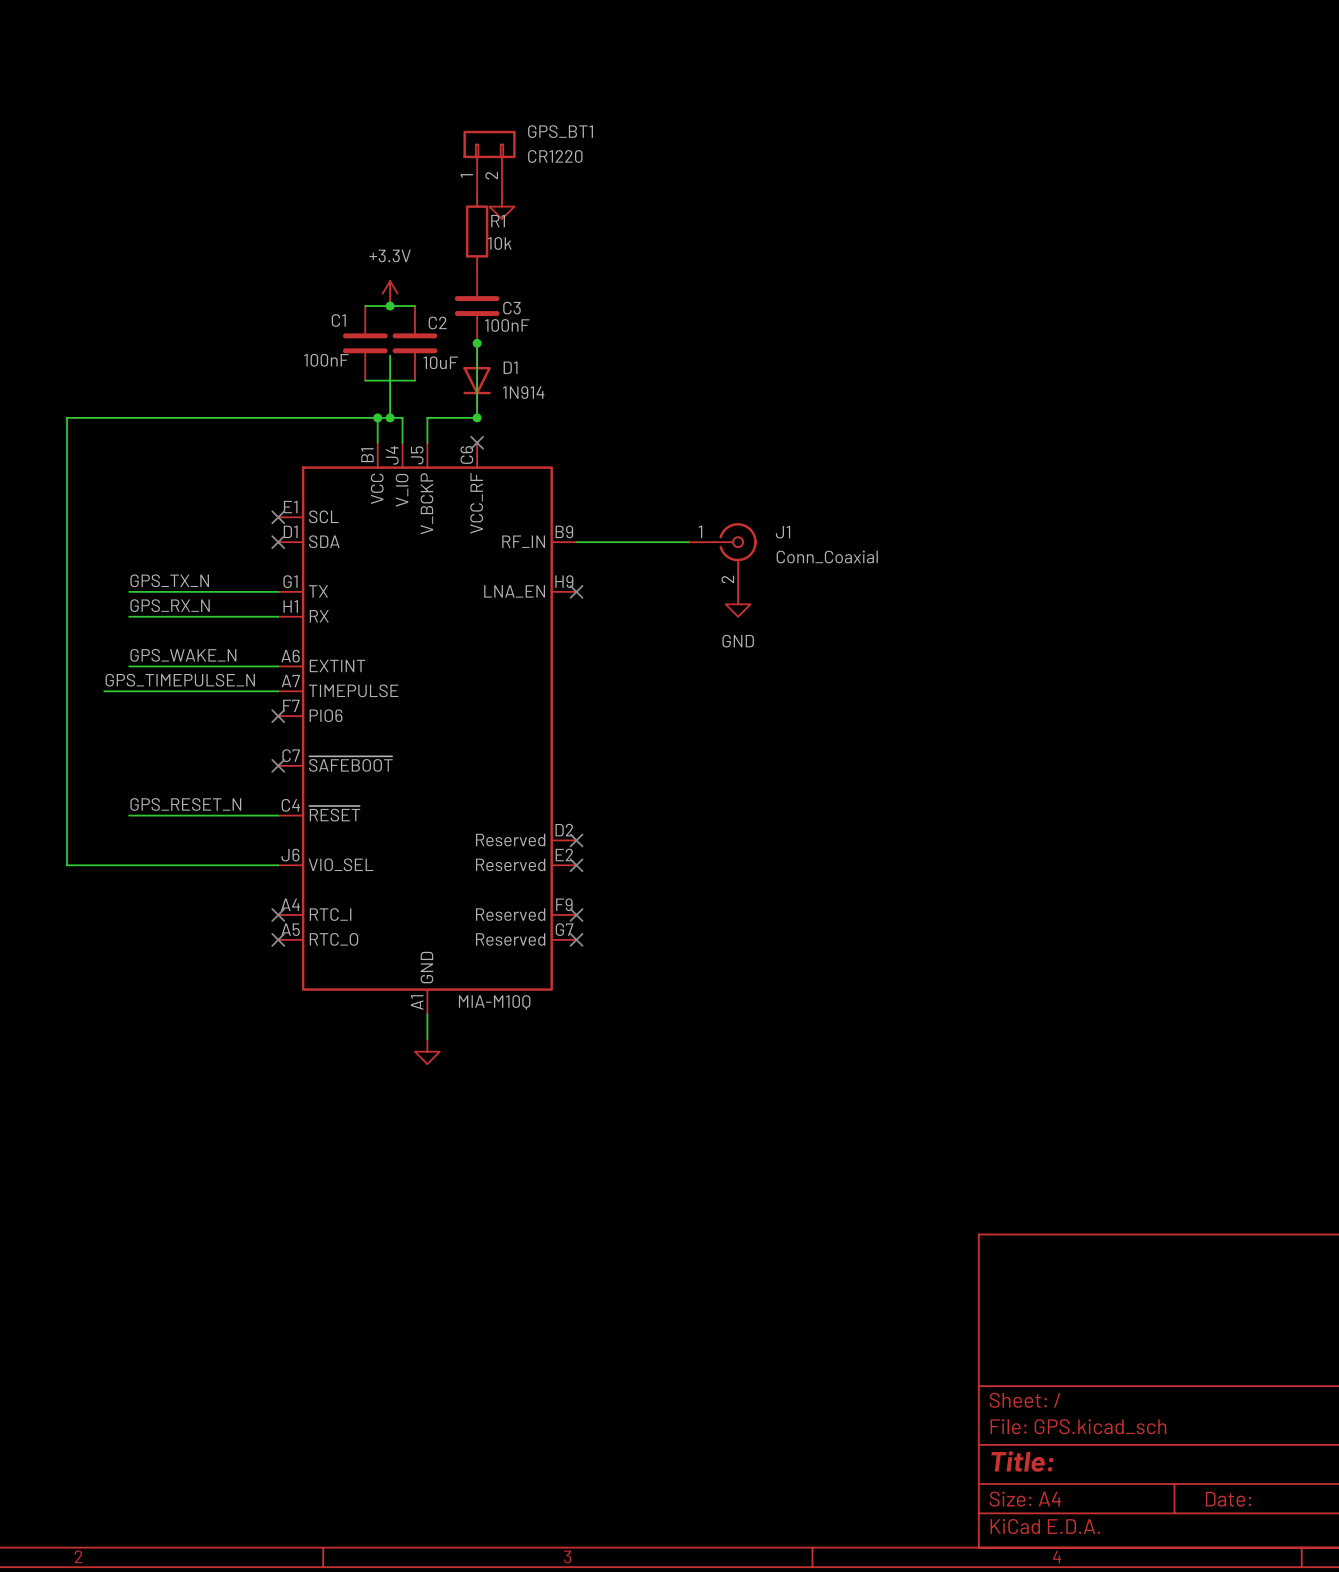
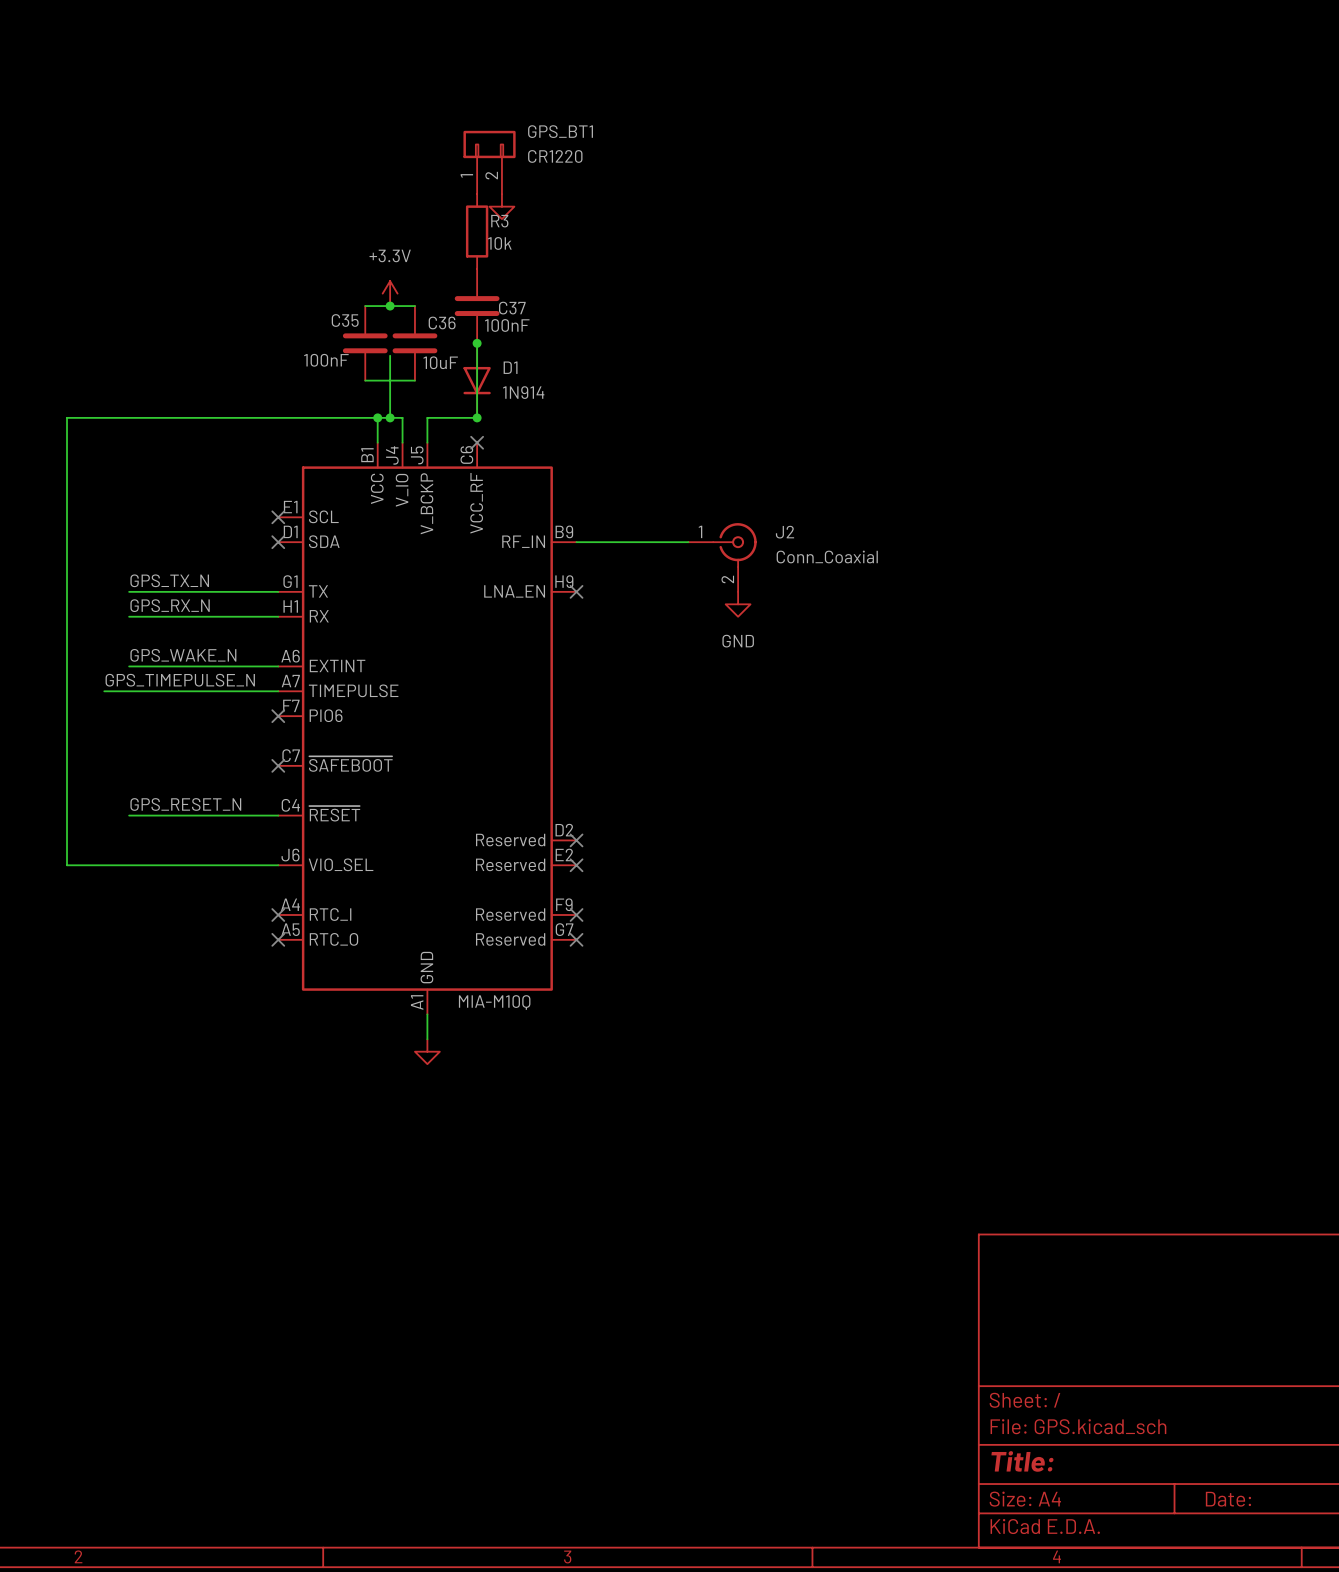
R1 name: R1 (498, 221) -> R3 (499, 221)
C3 name: C3 (511, 308) -> C37 (512, 308)
C1 name: C1 (338, 320) -> C35 (345, 320)
C2 name: C2 (437, 322) -> C36 (442, 322)
J1 name: J1 (783, 532) -> J2 (784, 532)

